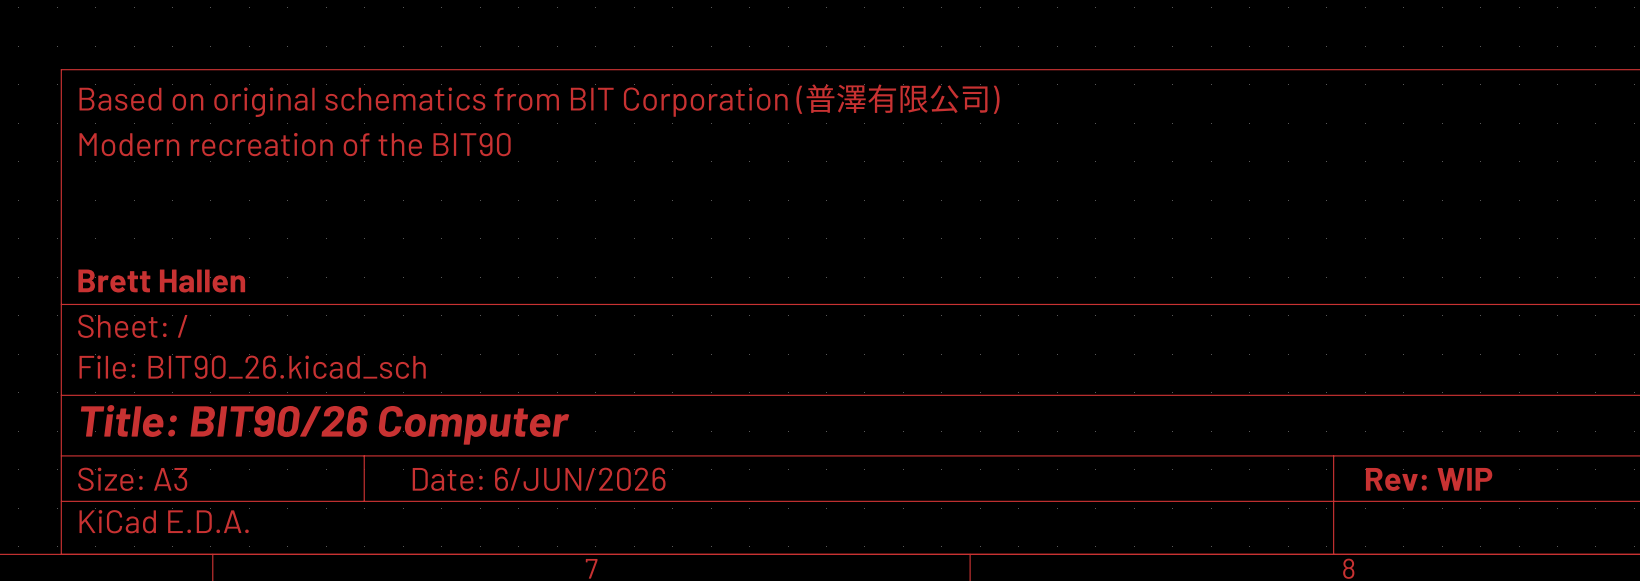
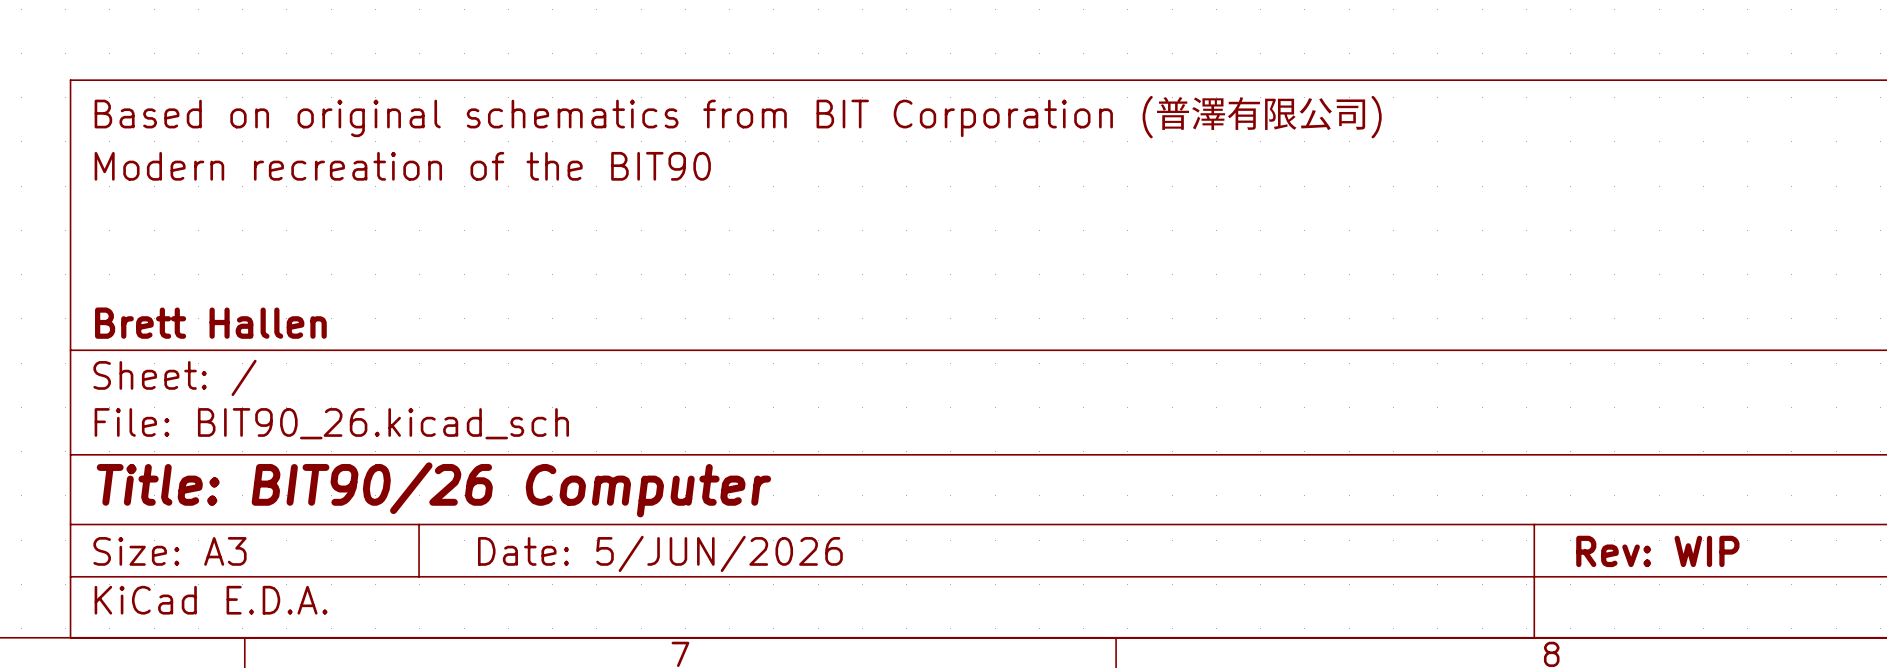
title block: Date: 6/JUN/2026 (539, 479) -> Date: 5/JUN/2026 (660, 553)

